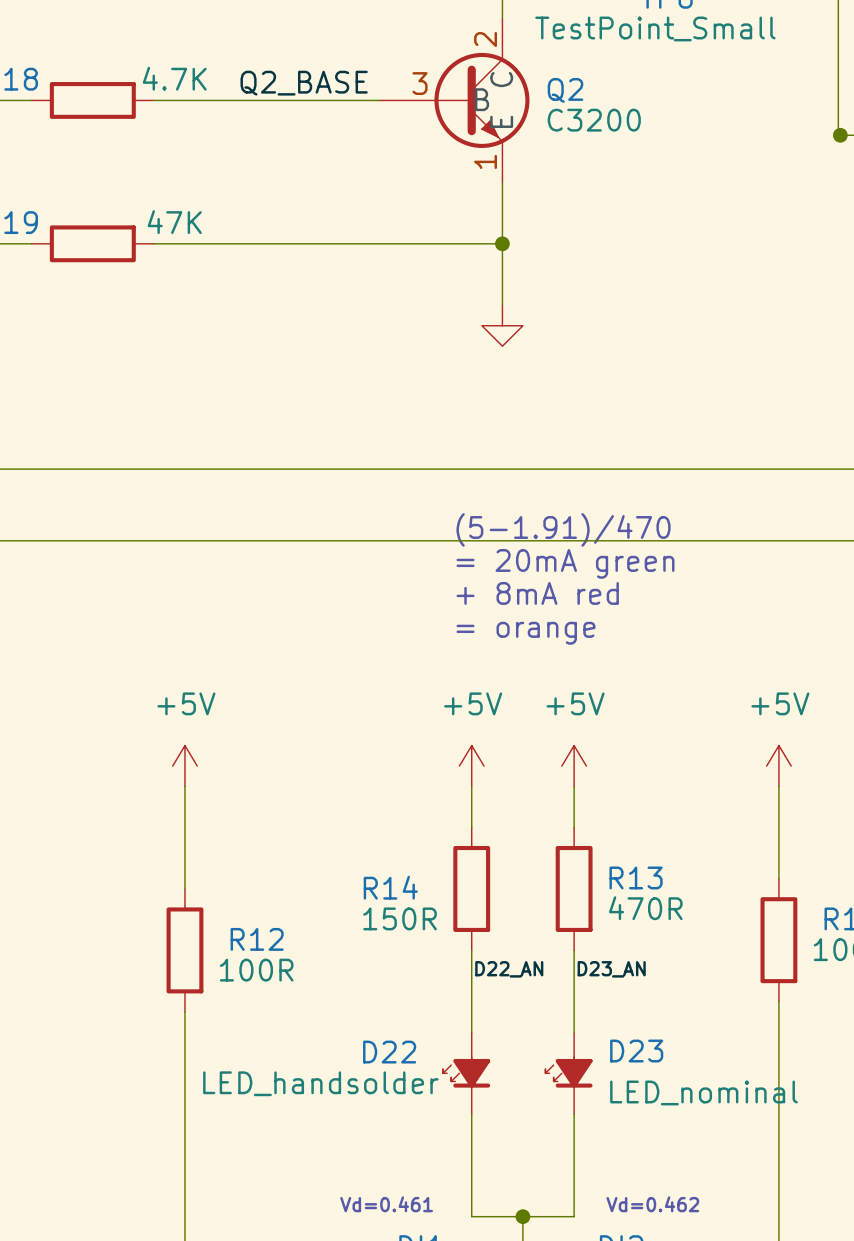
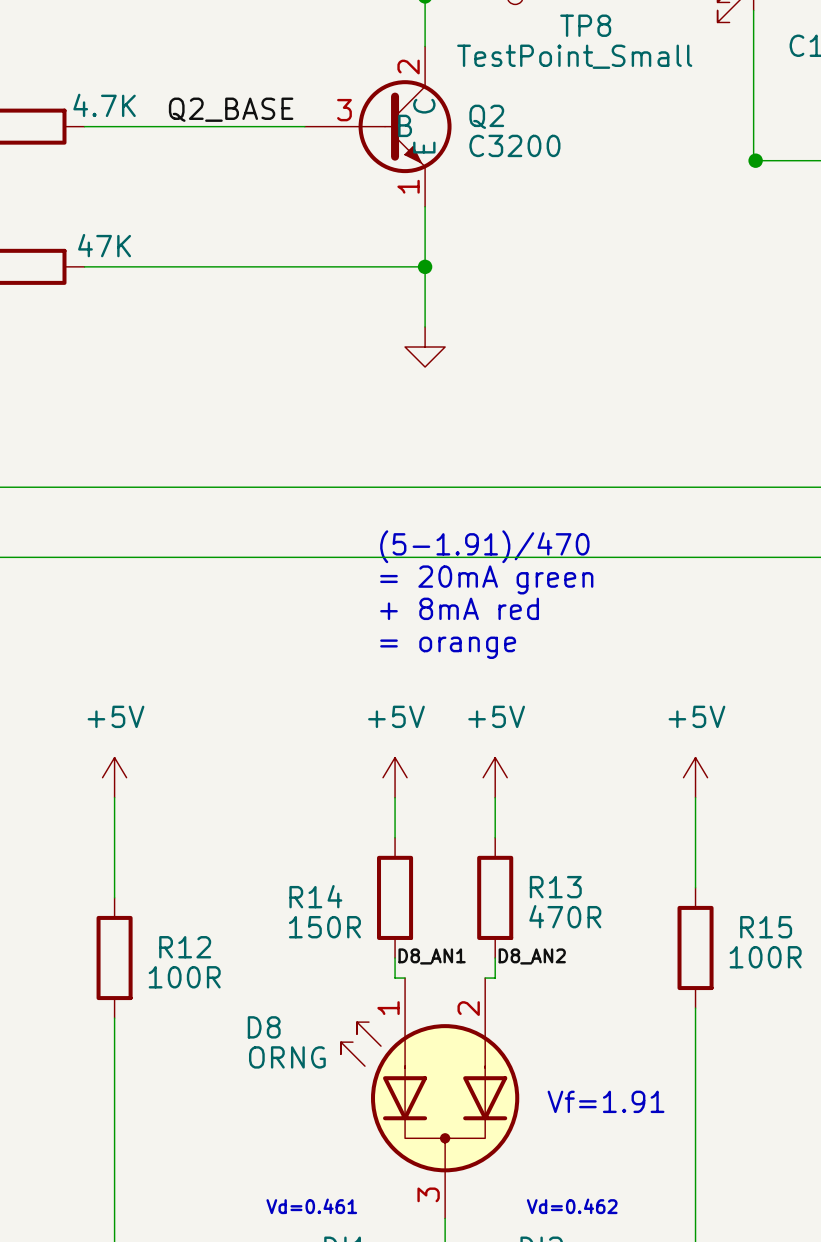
label: D22_AN (509, 969) -> D8_AN1 (432, 956)
label: D23_AN (611, 969) -> D8_AN2 (532, 956)
wire: (471, 970) (471, 1032) -> (395, 978) (405, 978)
wire: (574, 970) (574, 1032) -> (495, 978) (485, 978)
D22: LED_handsolder (466, 1073) -> none
D23: LED_nominal (569, 1073) -> none
D8: none -> ORNG (430, 1098)
text: none -> Vf=1.91 (606, 1101)
wire: (471, 1114) (471, 1216) (574, 1216) (574, 1114) -> none
junction: (522, 1216) -> none

